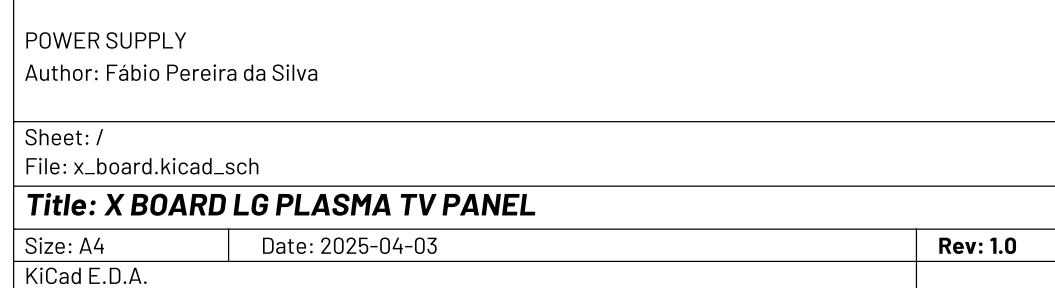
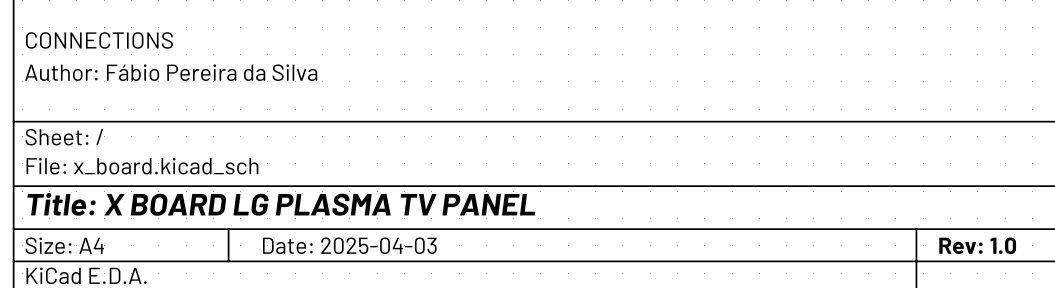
title block: POWER SUPPLY (106, 40) -> CONNECTIONS (99, 40)

